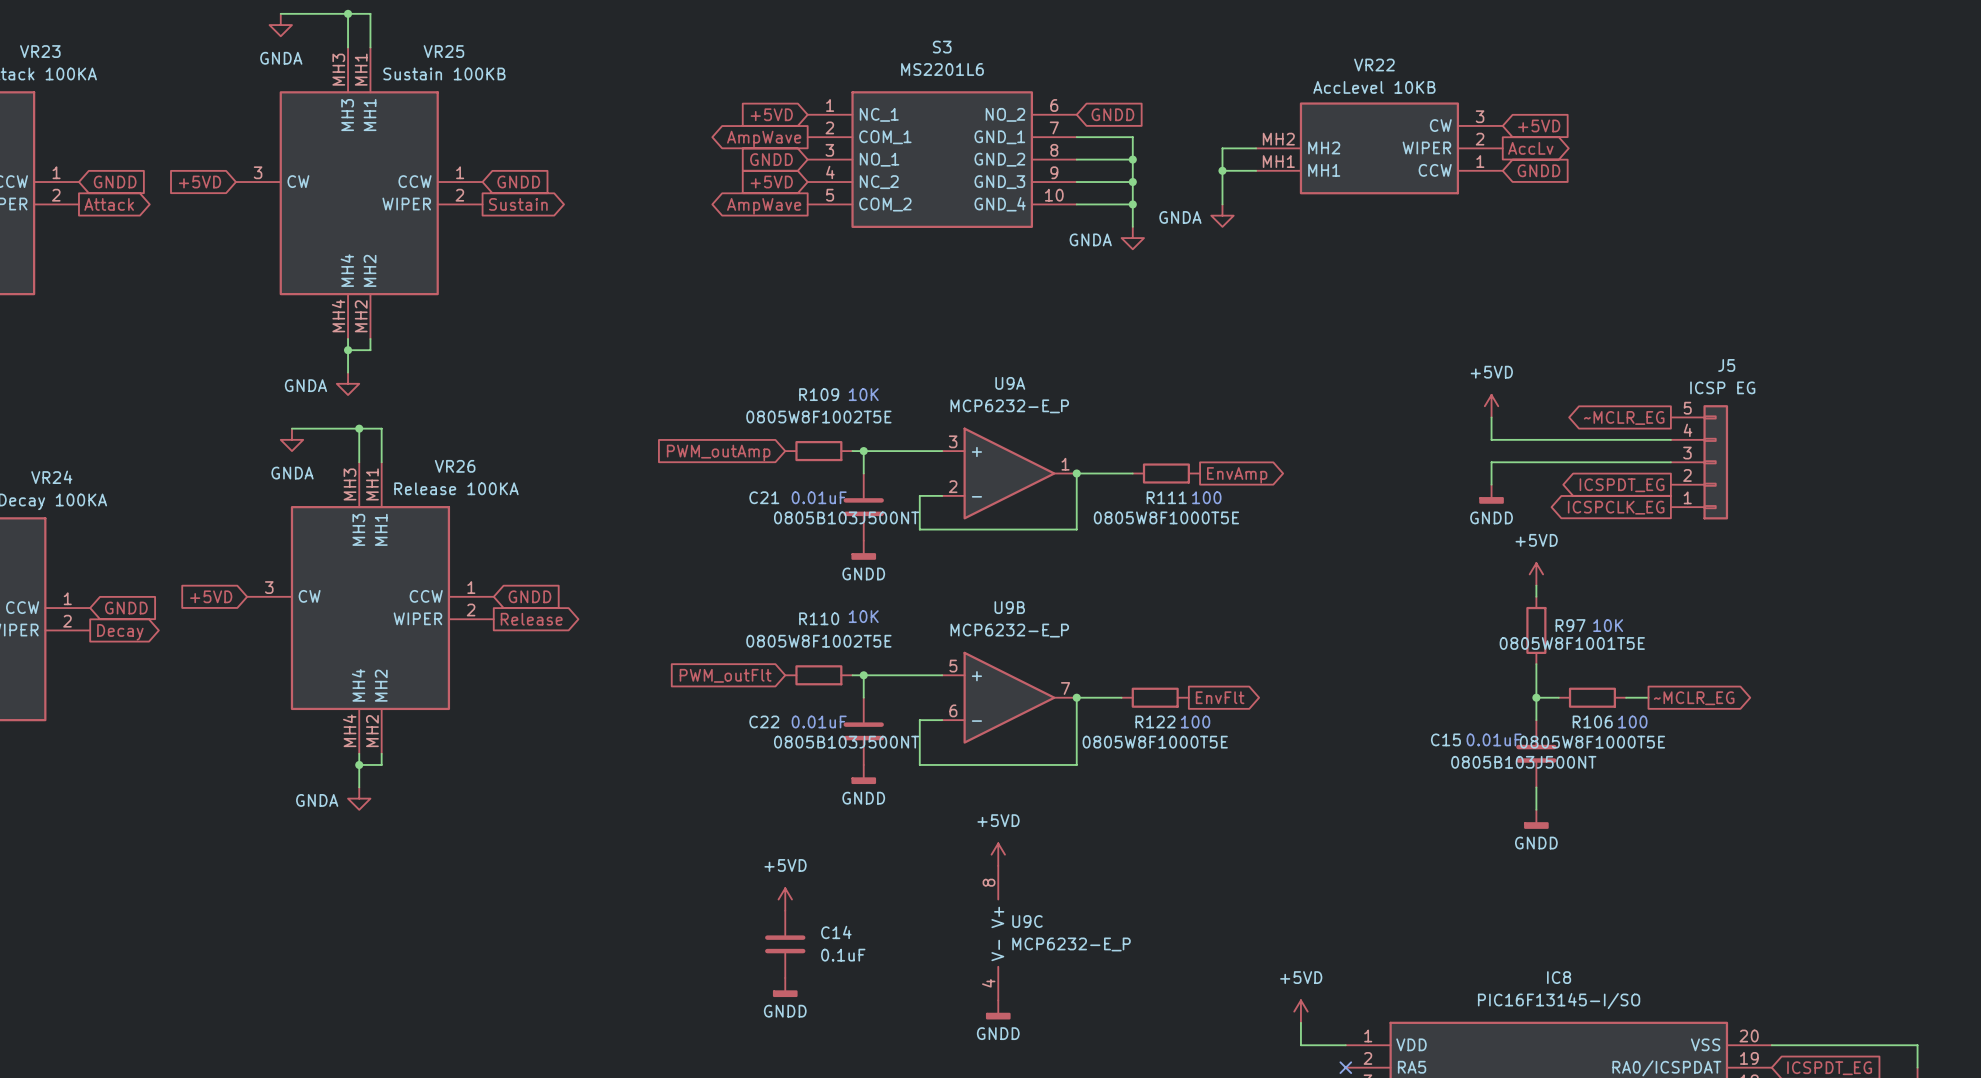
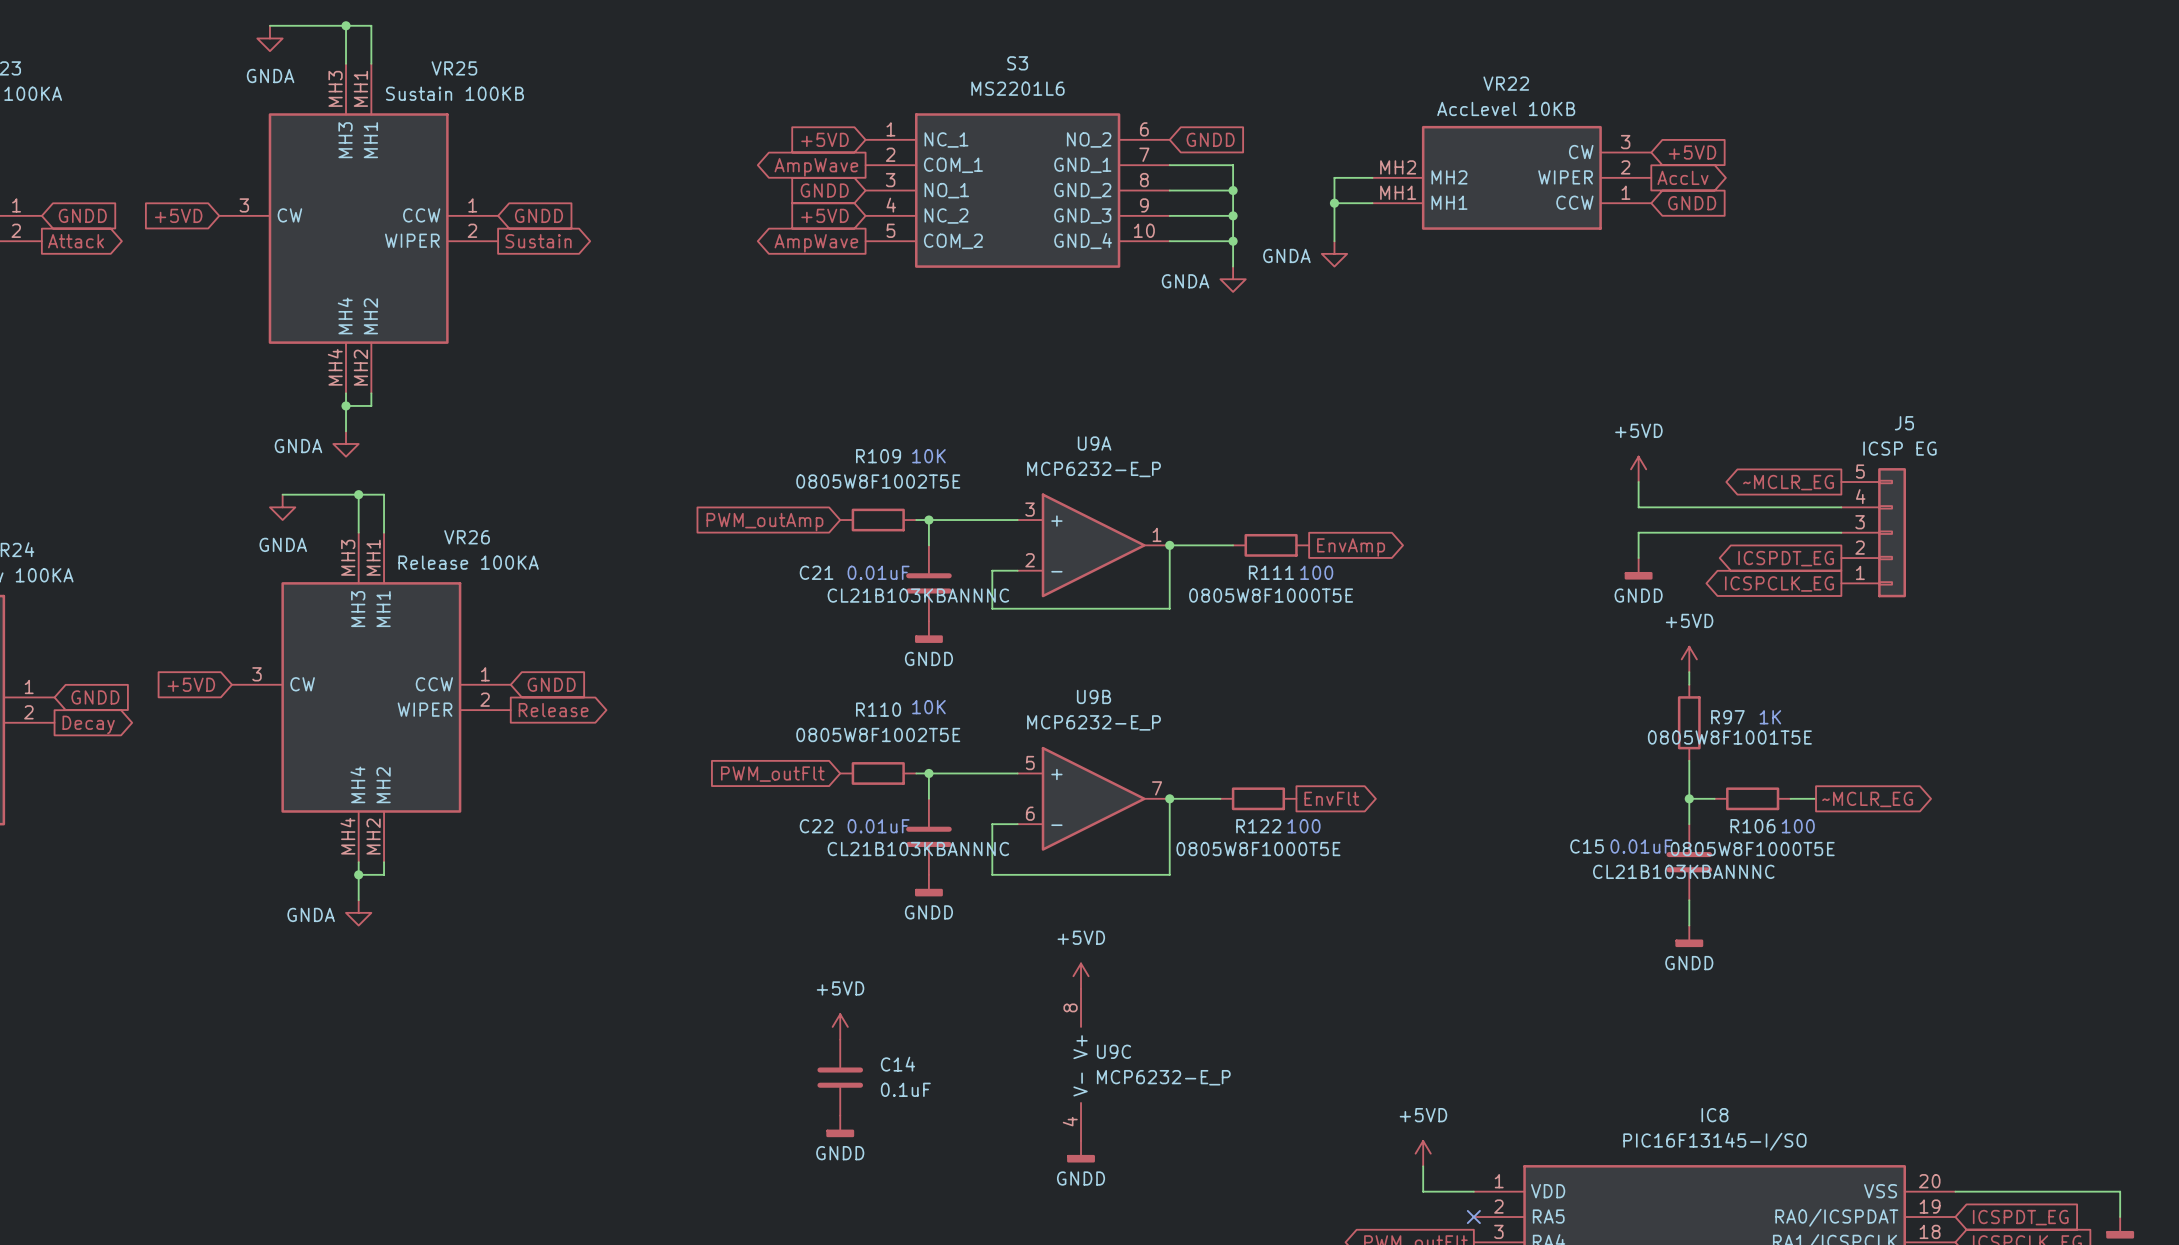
C21 value: 0805B103J500NT (846, 517) -> CL21B103KBANNNC (918, 595)
text: 10K (1608, 625) -> 1K (1770, 717)
C22 value: 0805B103J500NT (846, 742) -> CL21B103KBANNNC (918, 849)
C15 value: 0805B103J500NT (1523, 762) -> CL21B103KBANNNC (1683, 871)

